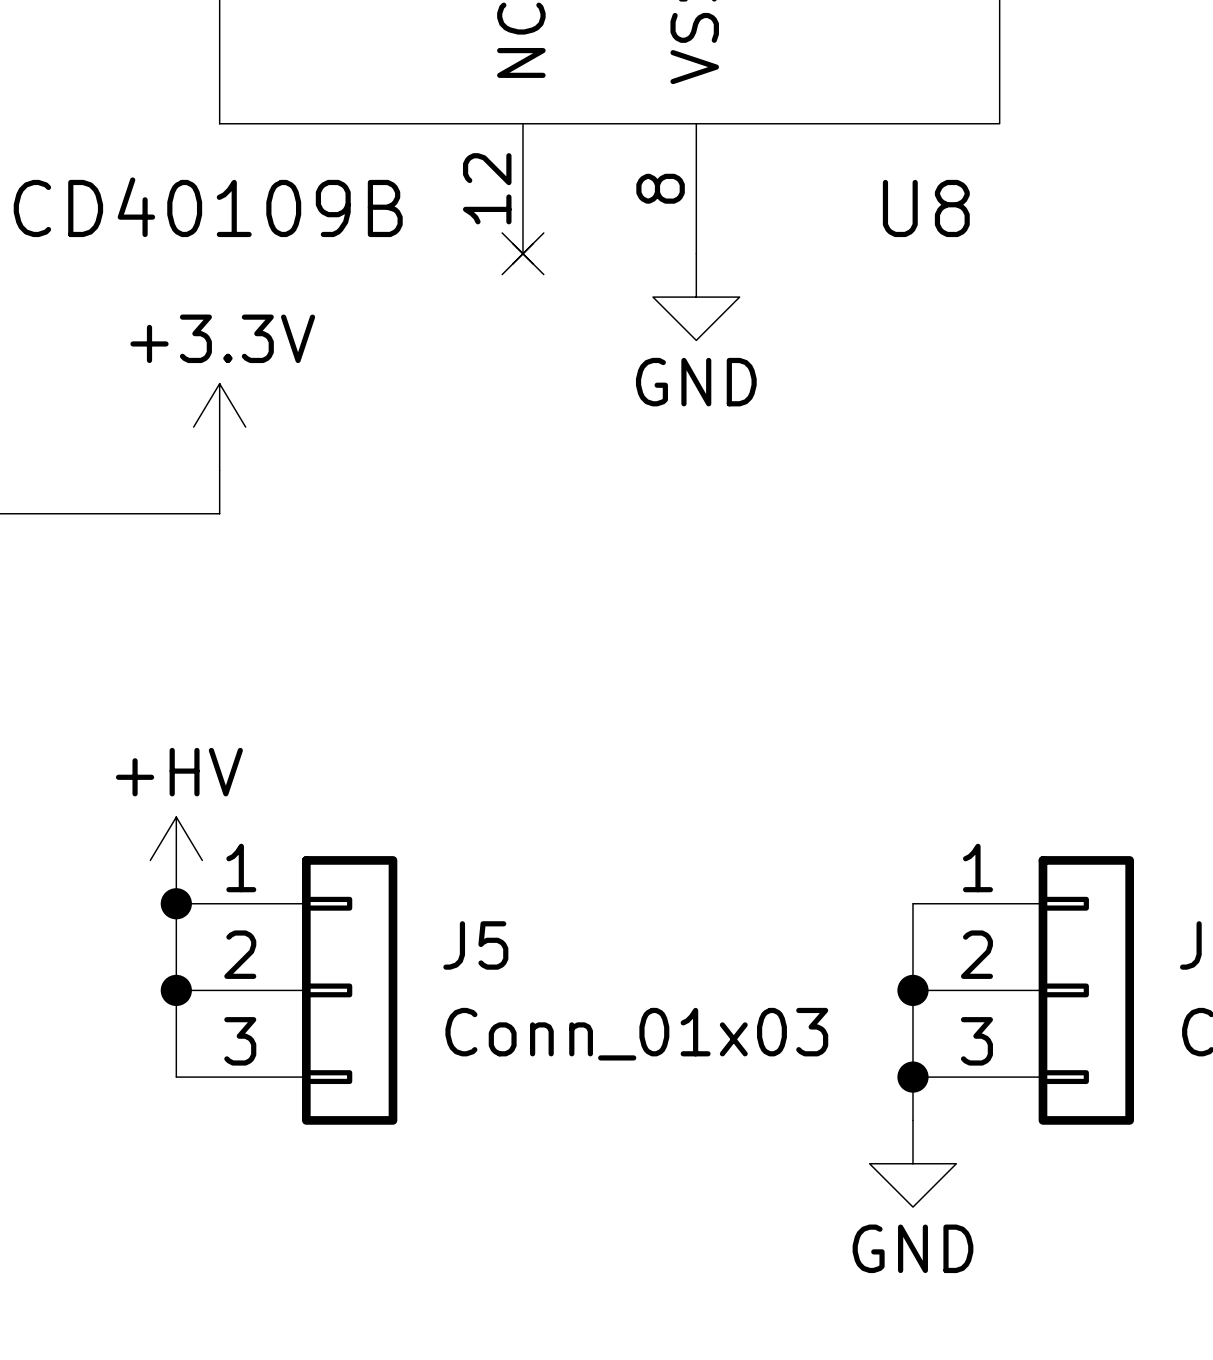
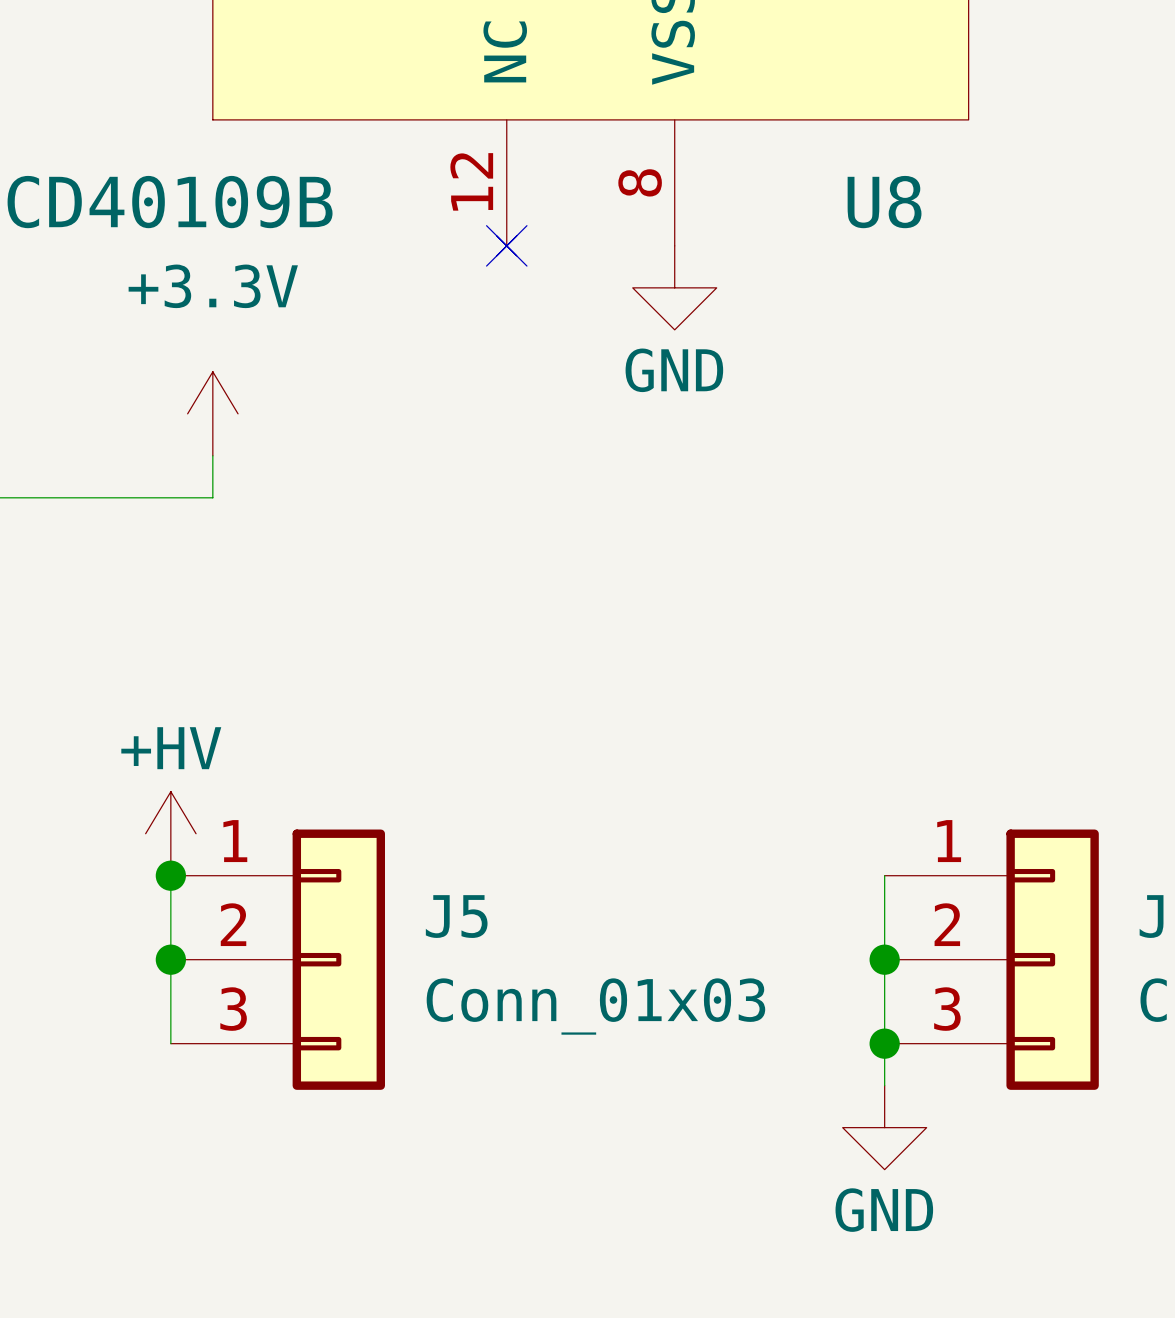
power symbol text position: +3.3V (222, 338) -> +3.3V (213, 286)

